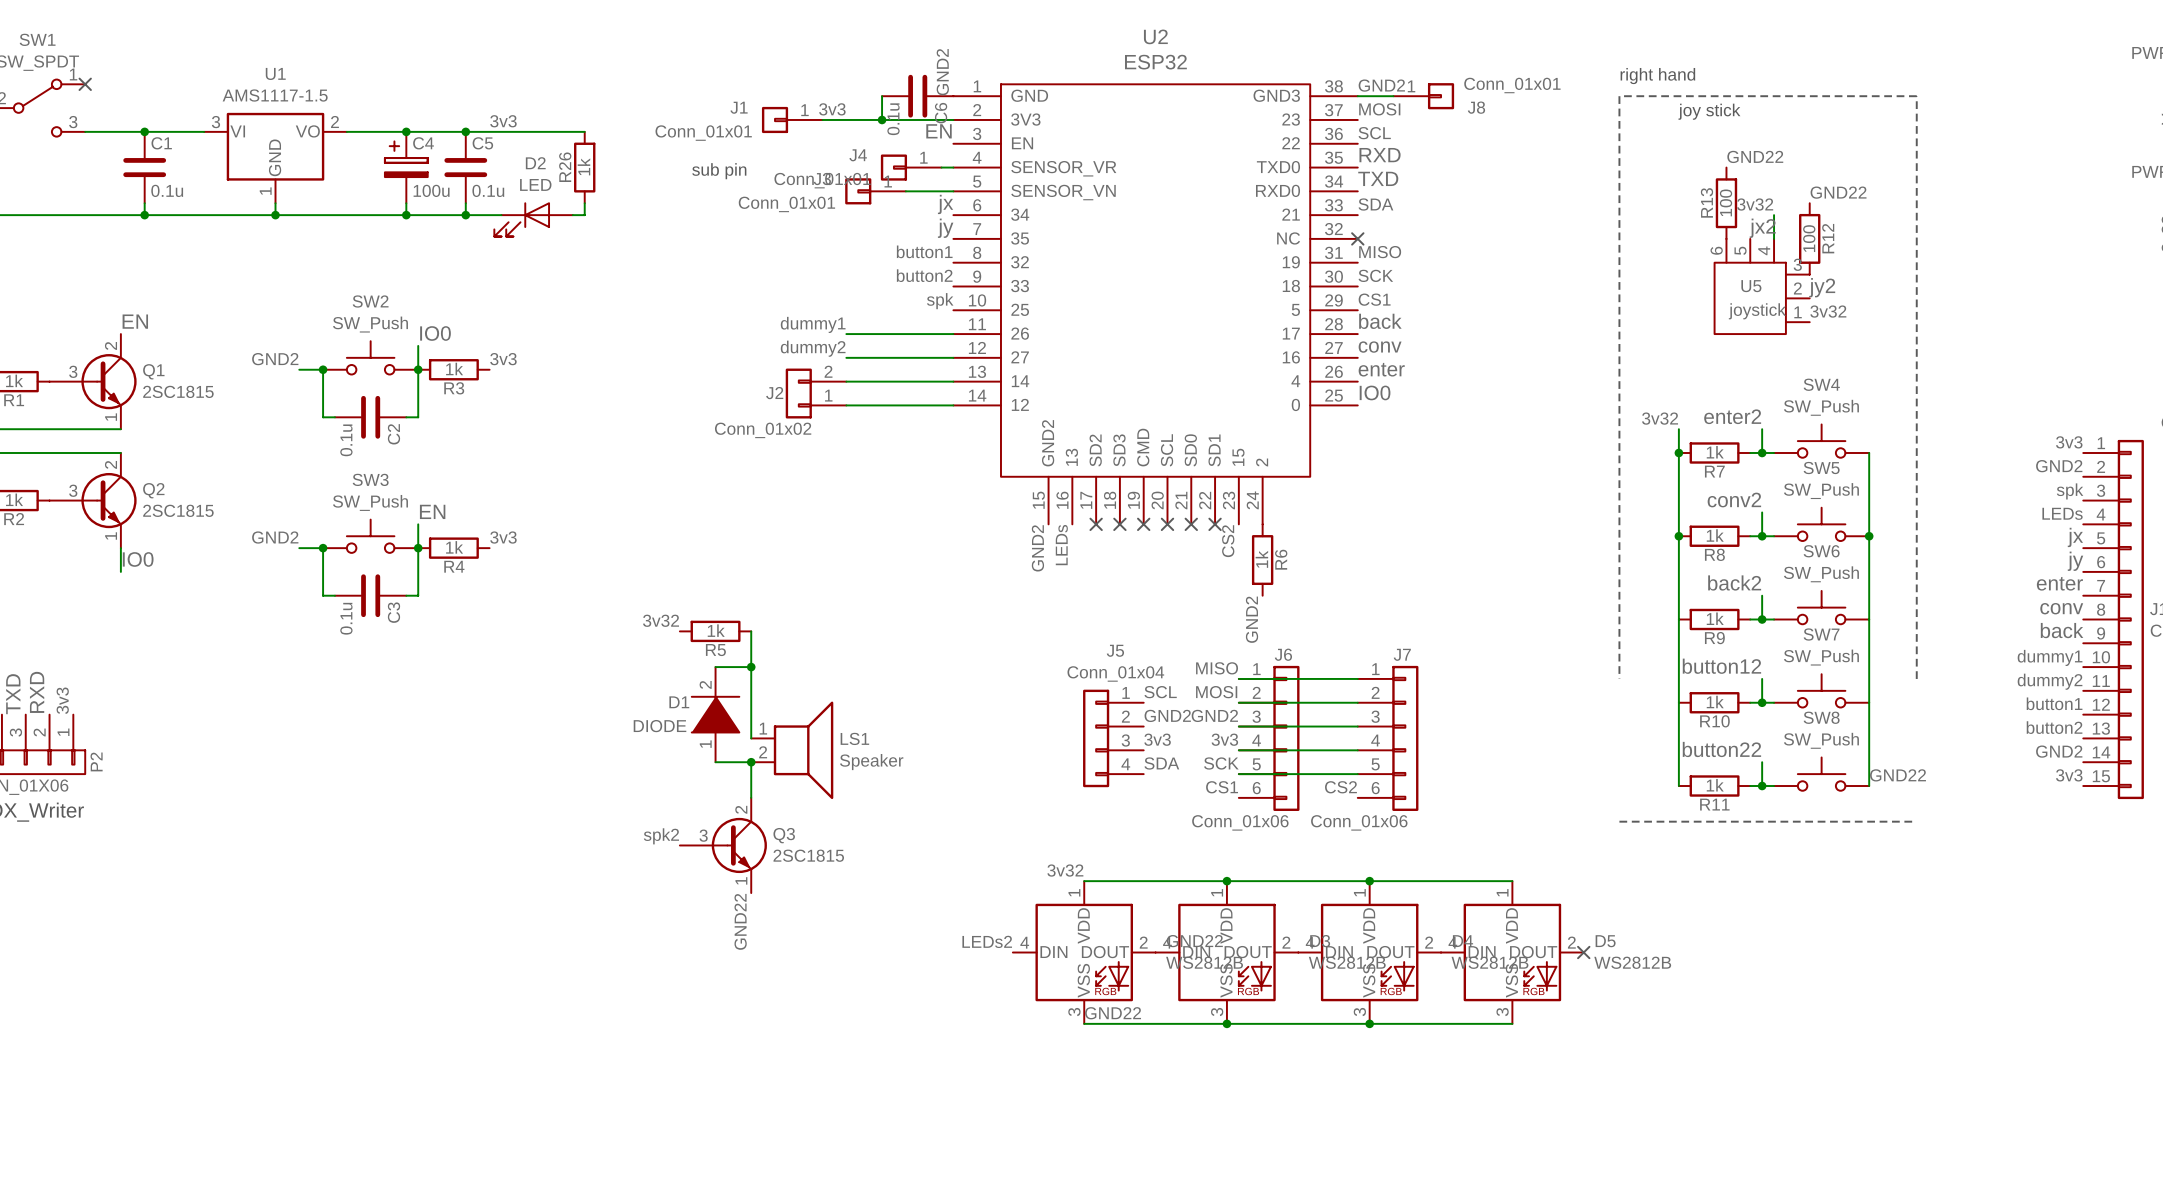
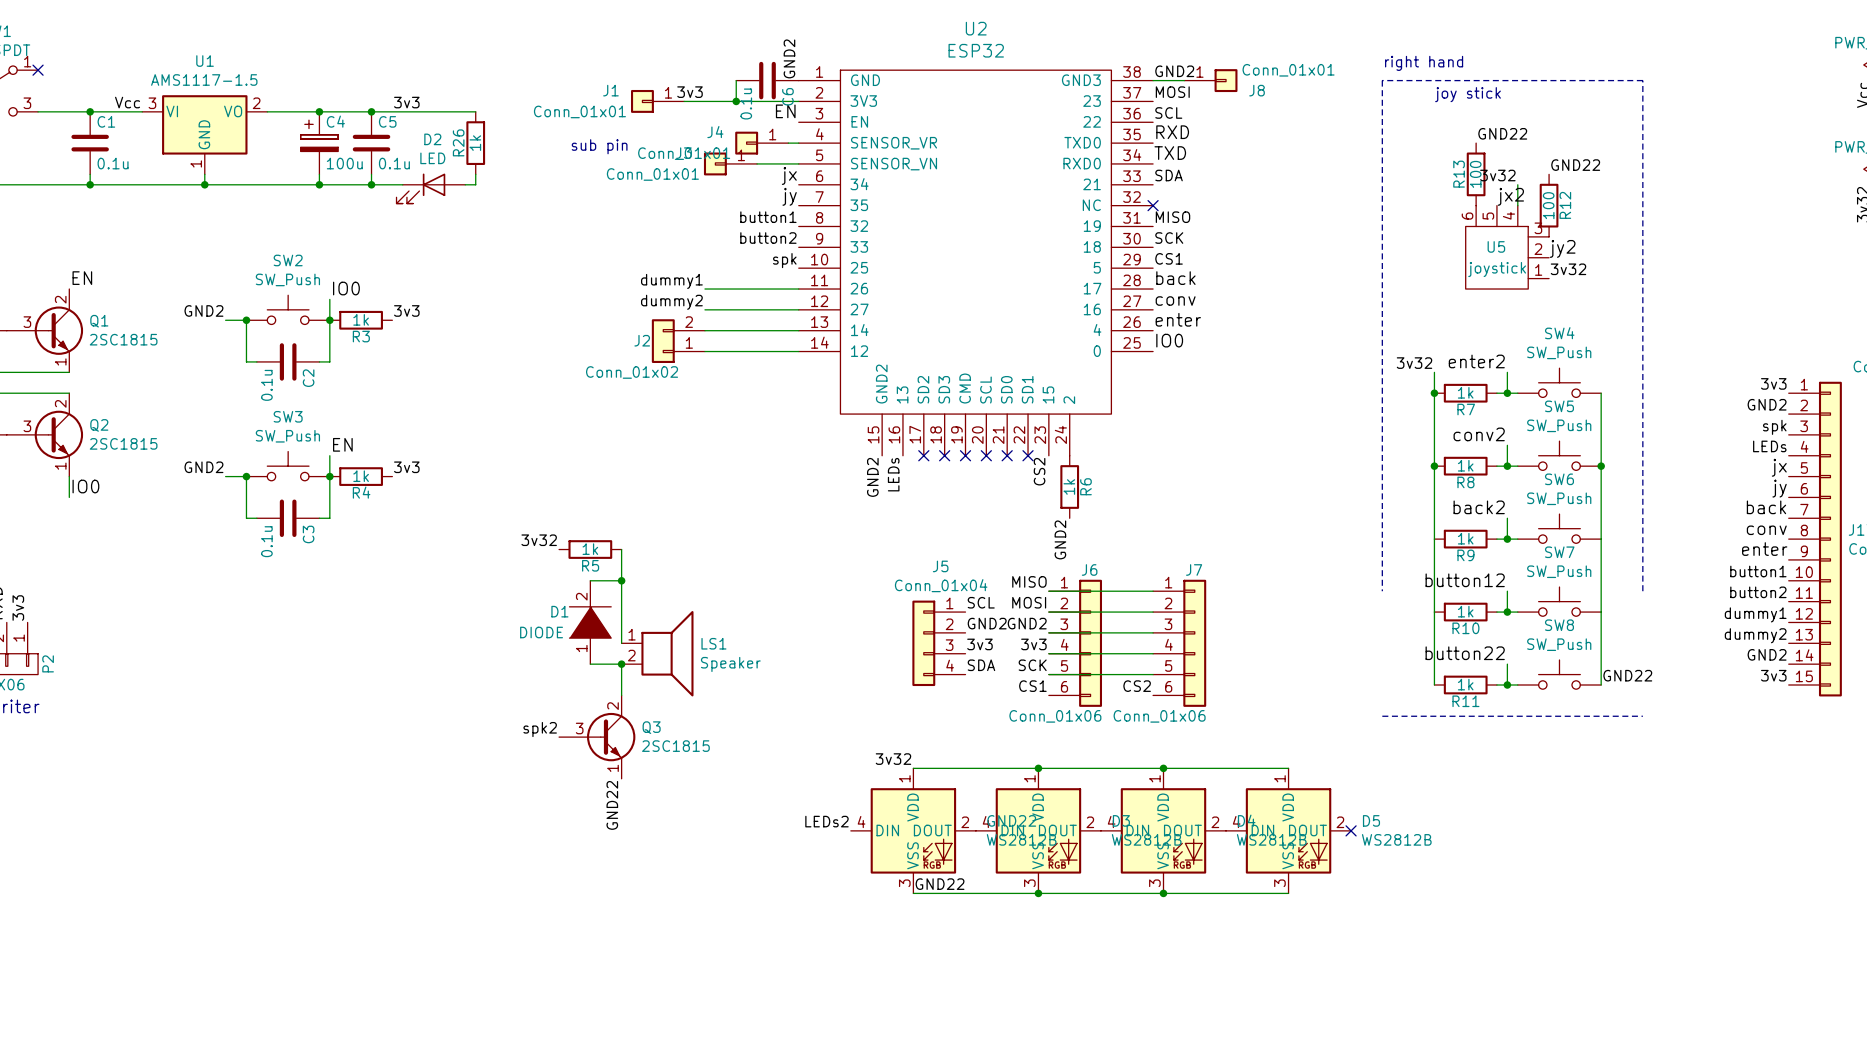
label: none -> Vcc (127, 102)
label: enter (2059, 583) -> back (1766, 507)
label: back (2062, 630) -> enter (1764, 549)
label: dummy1 (2050, 657) -> button1 (1758, 571)
label: dummy2 (2050, 681) -> button2 (1758, 592)
label: button1 (2054, 703) -> dummy1 (1755, 614)
label: button2 (2054, 727) -> dummy2 (1755, 635)

